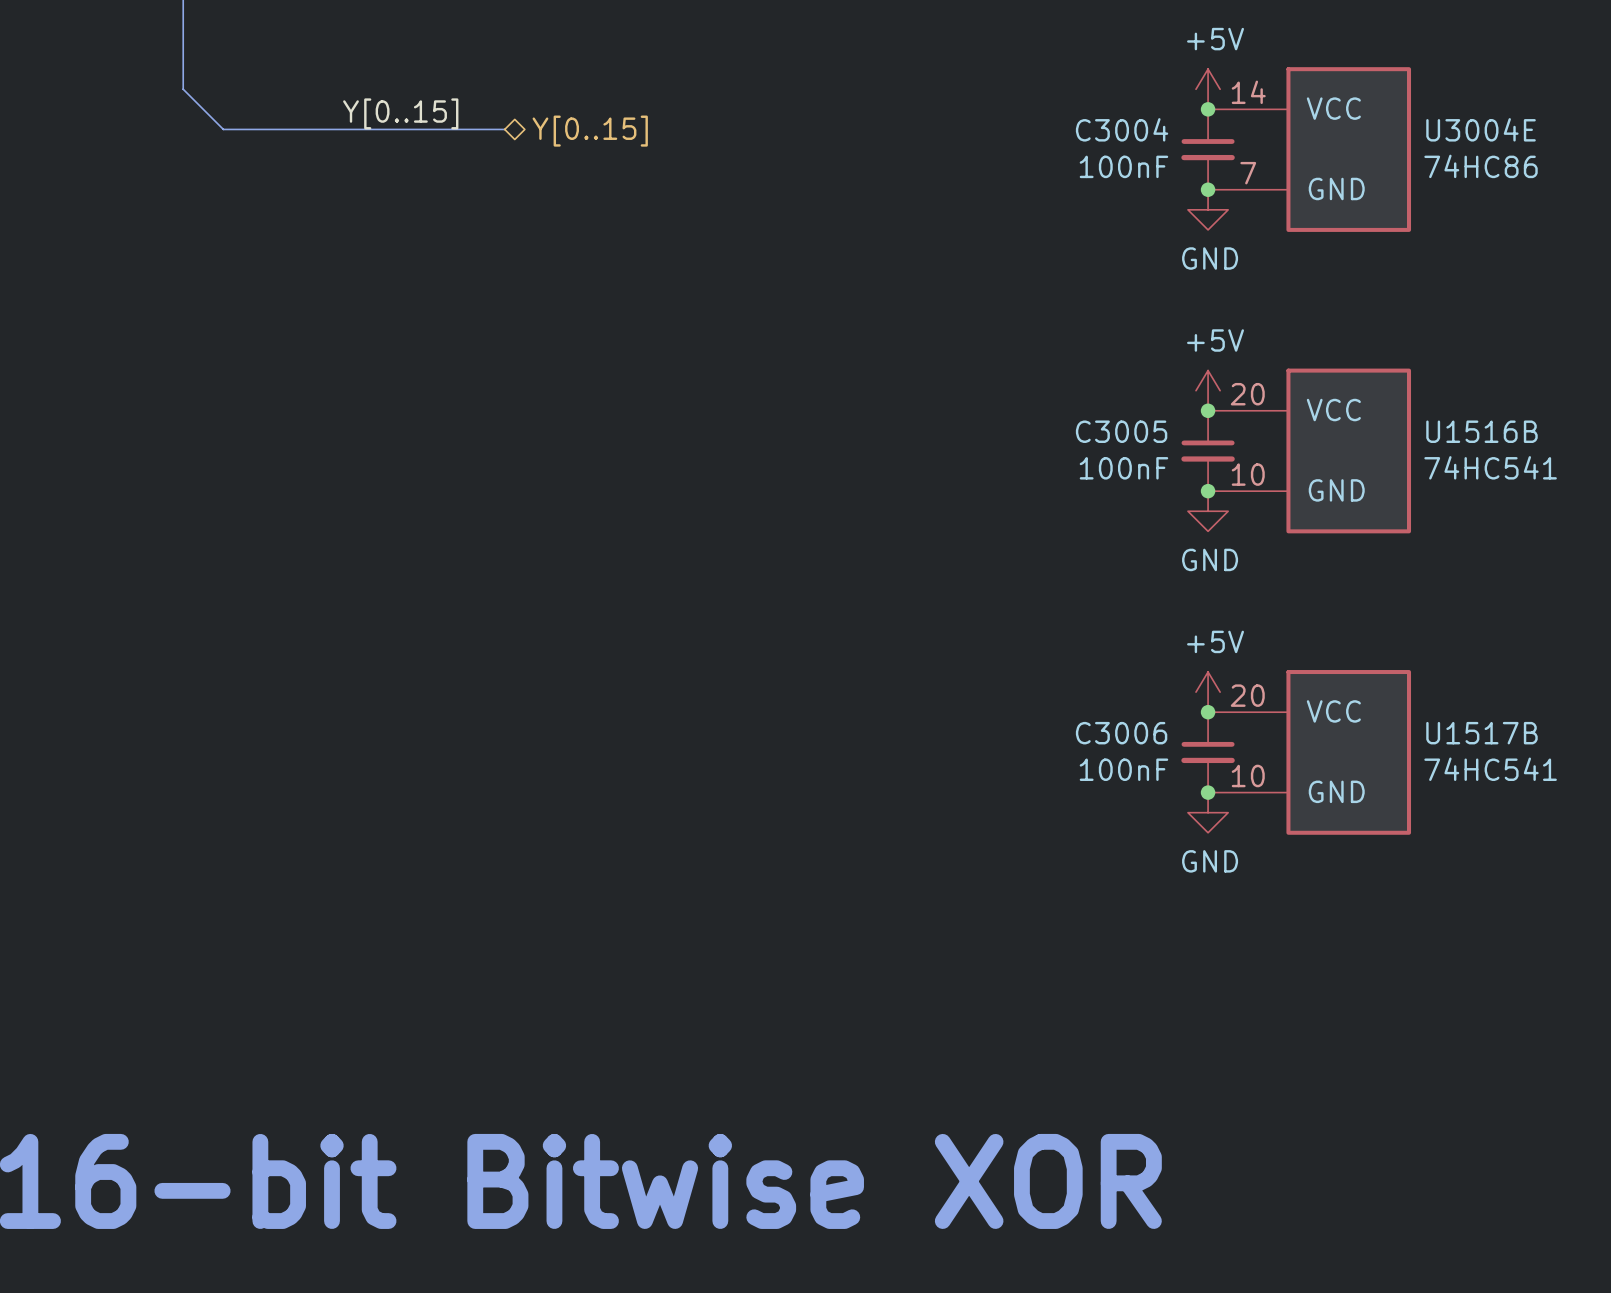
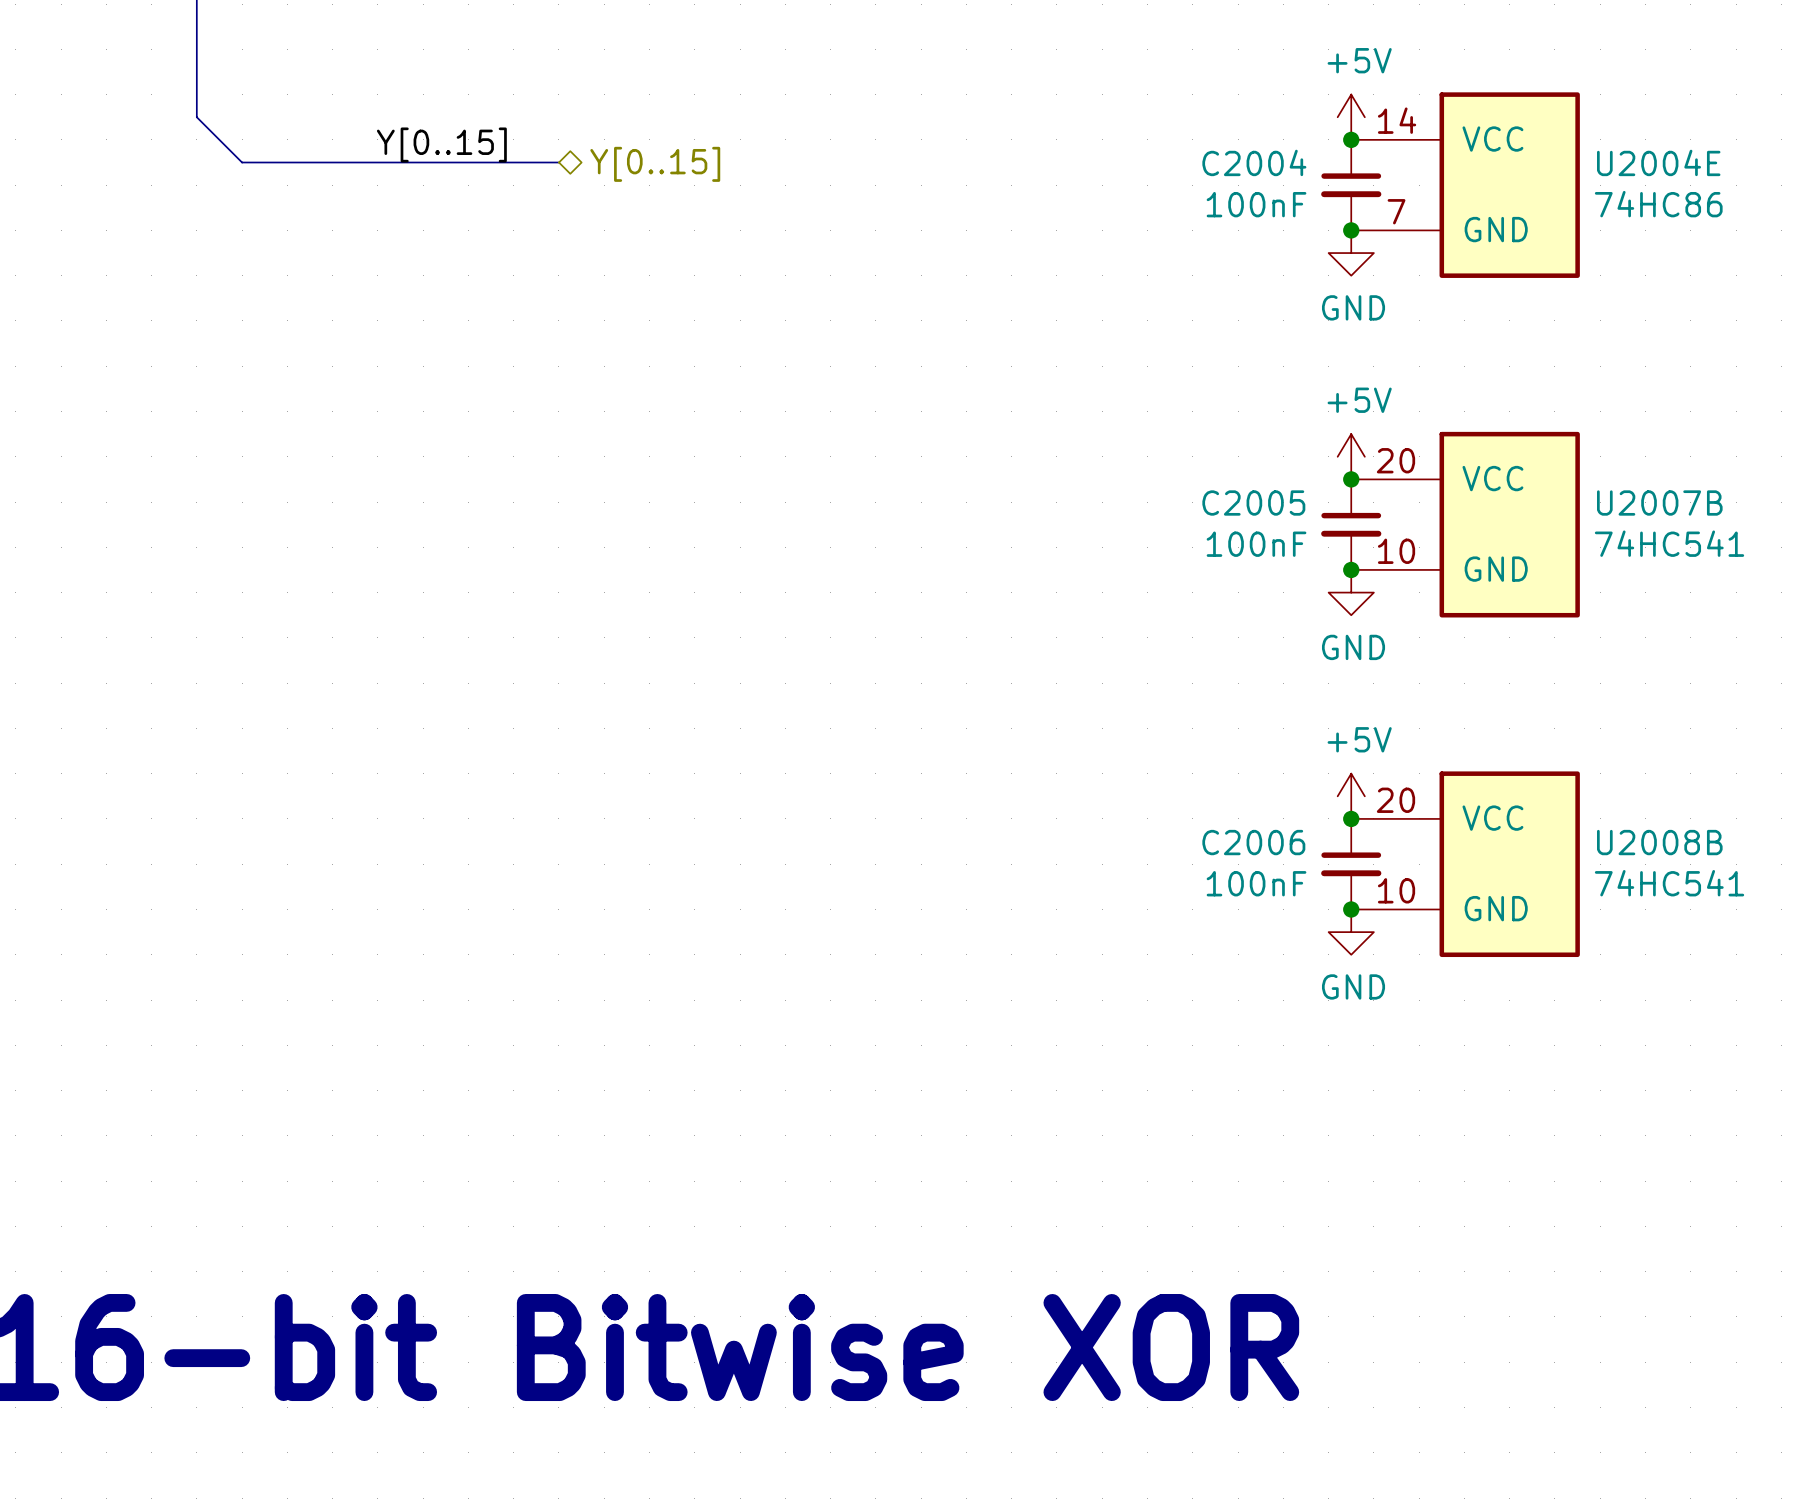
C3004 name: C3004 (1122, 129) -> C2004 (1254, 162)
U3004E name: U3004E (1481, 129) -> U2004E (1658, 162)
C3005 name: C3005 (1121, 431) -> C2005 (1253, 503)
U1516B name: U1516B (1481, 431) -> U2007B (1659, 503)
C3006 name: C3006 (1121, 733) -> C2006 (1253, 842)
U1517B name: U1517B (1481, 733) -> U2008B (1659, 842)

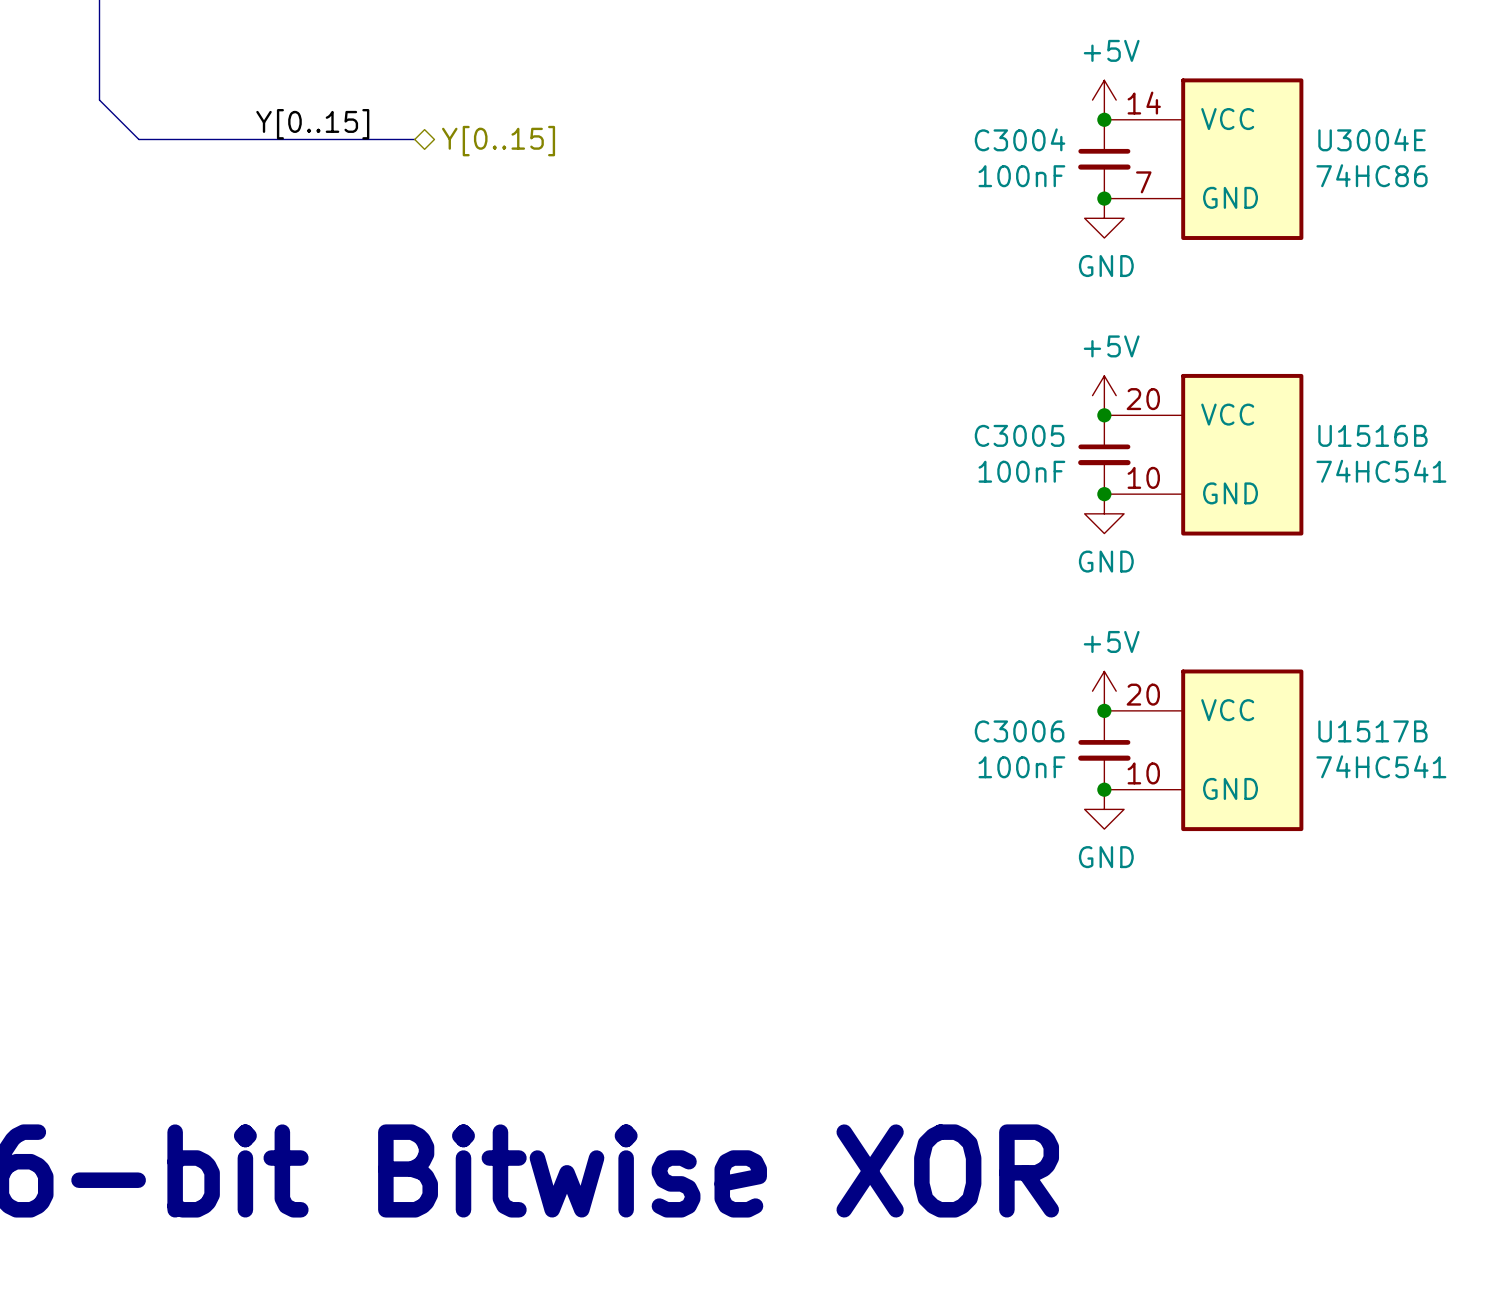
C2004 name: C2004 (1254, 162) -> C3004 (1020, 139)
U2004E name: U2004E (1658, 162) -> U3004E (1372, 139)
C2005 name: C2005 (1253, 503) -> C3005 (1019, 435)
U2007B name: U2007B (1659, 503) -> U1516B (1372, 435)
C2006 name: C2006 (1253, 842) -> C3006 (1019, 731)
U2008B name: U2008B (1659, 842) -> U1517B (1372, 731)

